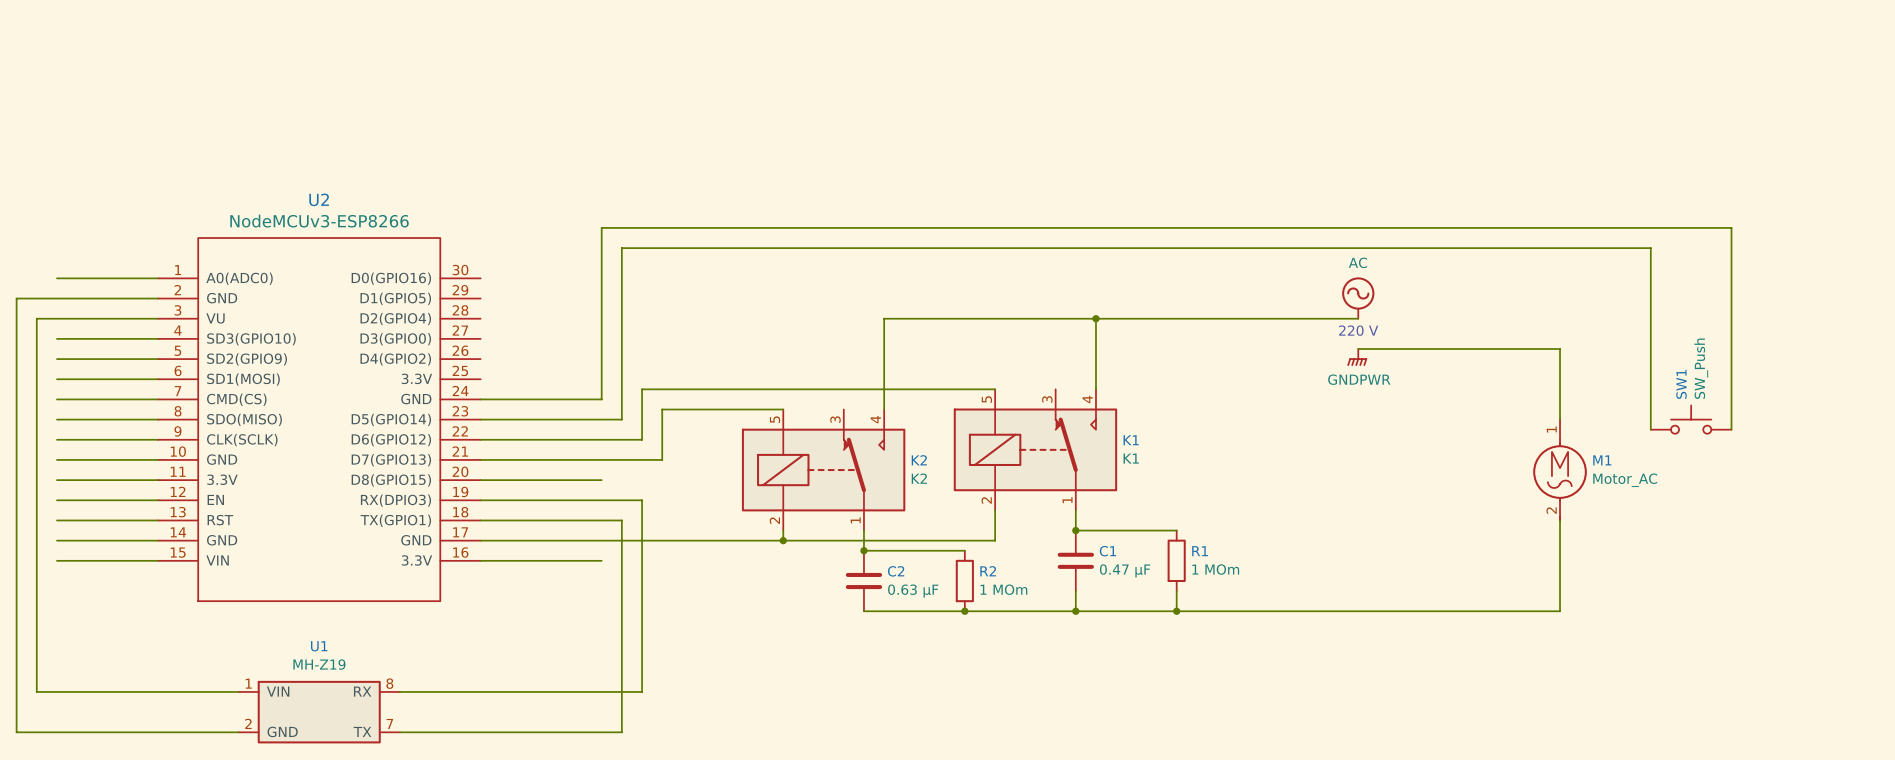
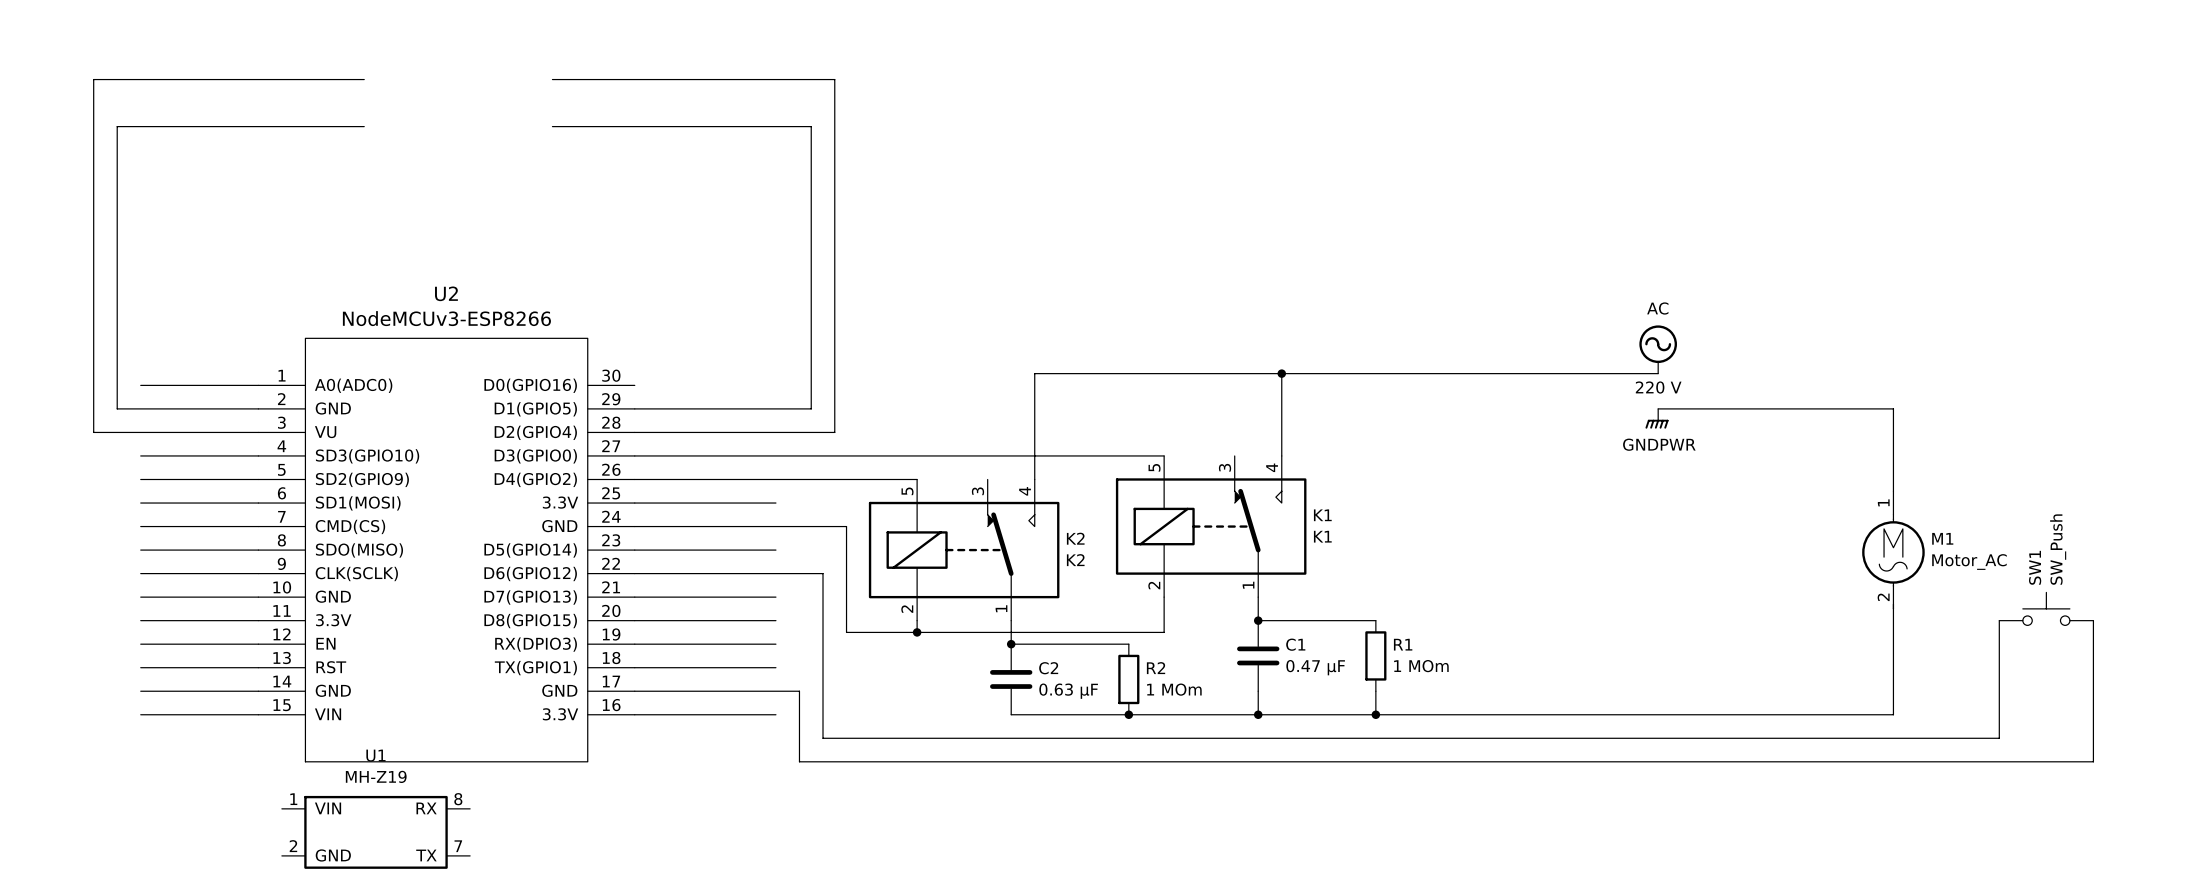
wire: none -> (364, 79) (93, 79) (93, 432) (258, 432)
wire: none -> (552, 79) (834, 79) (834, 432) (634, 432)
wire: none -> (364, 126) (117, 126) (117, 408) (258, 408)
wire: none -> (552, 126) (811, 126) (811, 408) (634, 408)
wire: (56, 278) (157, 278) -> (140, 385) (258, 385)
wire: (157, 298) (16, 298) (16, 732) (238, 732) -> none
power symbol position: AC (1358, 298) -> AC (1658, 349)
wire: (157, 318) (36, 318) (36, 691) (238, 691) -> none
text position: 220 V (1358, 330) -> 220 V (1658, 387)
wire: (56, 338) (157, 338) -> (140, 455) (258, 455)
wire: (1358, 348) (1418, 348) -> (1587, 373) (1658, 373)
wire: (1560, 348) (1560, 419) -> (1822, 408) (1893, 408) (1893, 491)
power symbol position: GNDPWR (1357, 357) -> GNDPWR (1657, 418)
wire: (56, 359) (157, 359) -> (140, 479) (258, 479)
wire: (56, 379) (157, 379) -> (140, 503) (258, 503)
wire: (642, 389) (642, 439) (480, 439) -> (752, 455) (634, 455)
wire: (56, 399) (157, 399) -> (140, 526) (258, 526)
wire: (480, 399) (601, 399) (601, 227) (1731, 227) (1731, 429) -> none
wire: (662, 409) (662, 459) (480, 459) -> (775, 479) (634, 479)
wire: (56, 419) (157, 419) -> (140, 550) (258, 550)
U2 position: (319, 419) -> (446, 550)
wire: (480, 419) (621, 419) (621, 248) (1650, 248) (1650, 429) -> none
SW1 position: (1691, 419) -> (2046, 608)
wire: none -> (634, 503) (775, 503)
wire: (56, 439) (157, 439) -> (140, 573) (258, 573)
wire: (56, 459) (157, 459) -> (140, 597) (258, 597)
wire: none -> (634, 550) (775, 550)
M1 position: (1560, 470) -> (1893, 550)
wire: (56, 480) (157, 480) -> (140, 620) (258, 620)
wire: (480, 480) (601, 480) -> (634, 620) (775, 620)
wire: none -> (634, 573) (823, 573) (823, 738) (1999, 738) (1999, 620)
wire: (56, 500) (157, 500) -> (140, 644) (258, 644)
wire: (480, 500) (642, 500) (642, 691) (399, 691) -> none
wire: none -> (634, 597) (775, 597)
wire: (56, 520) (157, 520) -> (140, 667) (258, 667)
wire: (480, 520) (621, 520) (621, 732) (399, 732) -> none
wire: (1560, 520) (1560, 611) -> (1893, 608) (1893, 714) (1822, 714)
wire: none -> (2093, 620) (2093, 761) (799, 761) (799, 691) (634, 691)
wire: (56, 540) (157, 540) -> (140, 691) (258, 691)
wire: (480, 540) (722, 540) -> (634, 526) (846, 526) (846, 632)
wire: none -> (634, 644) (775, 644)
wire: (56, 560) (157, 560) -> (140, 714) (258, 714)
wire: (480, 560) (601, 560) -> (634, 714) (775, 714)
wire: none -> (634, 667) (775, 667)

